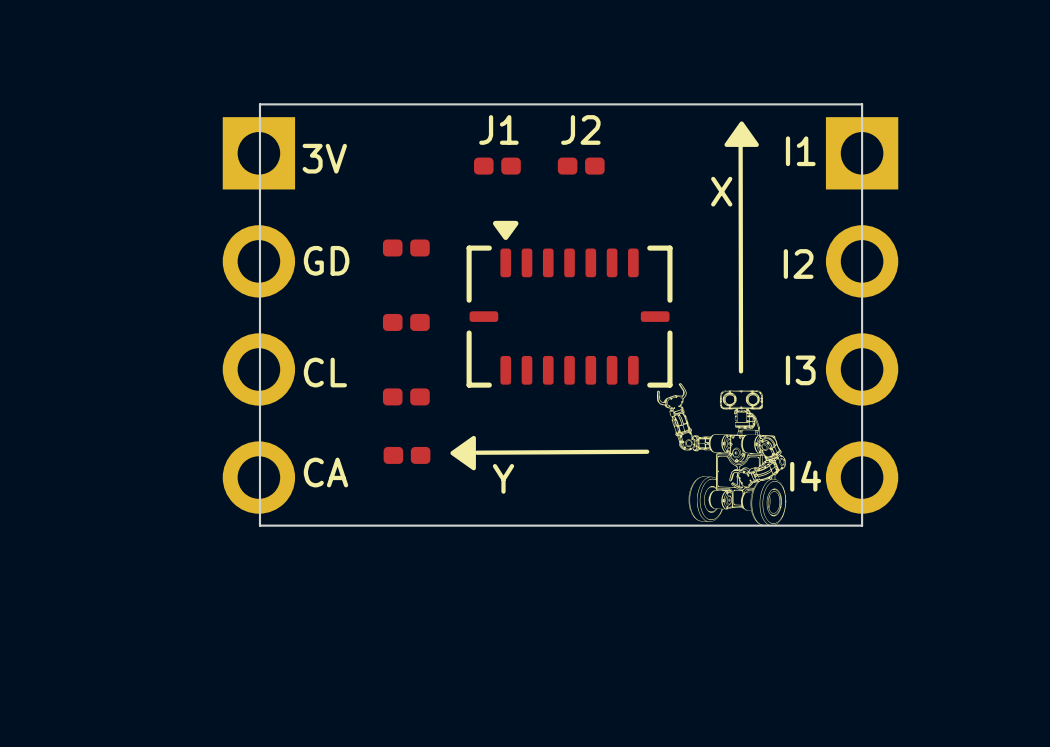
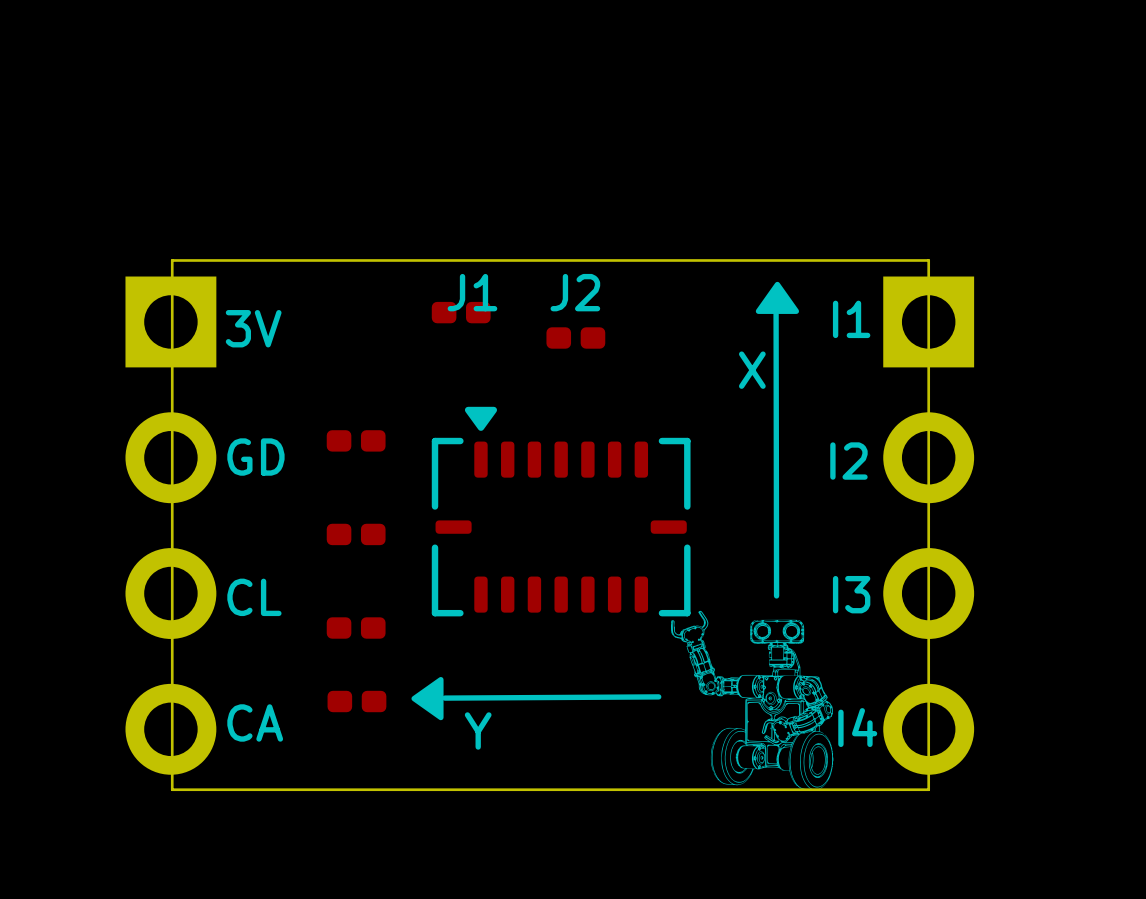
part position: (497, 166) -> (461, 312)

